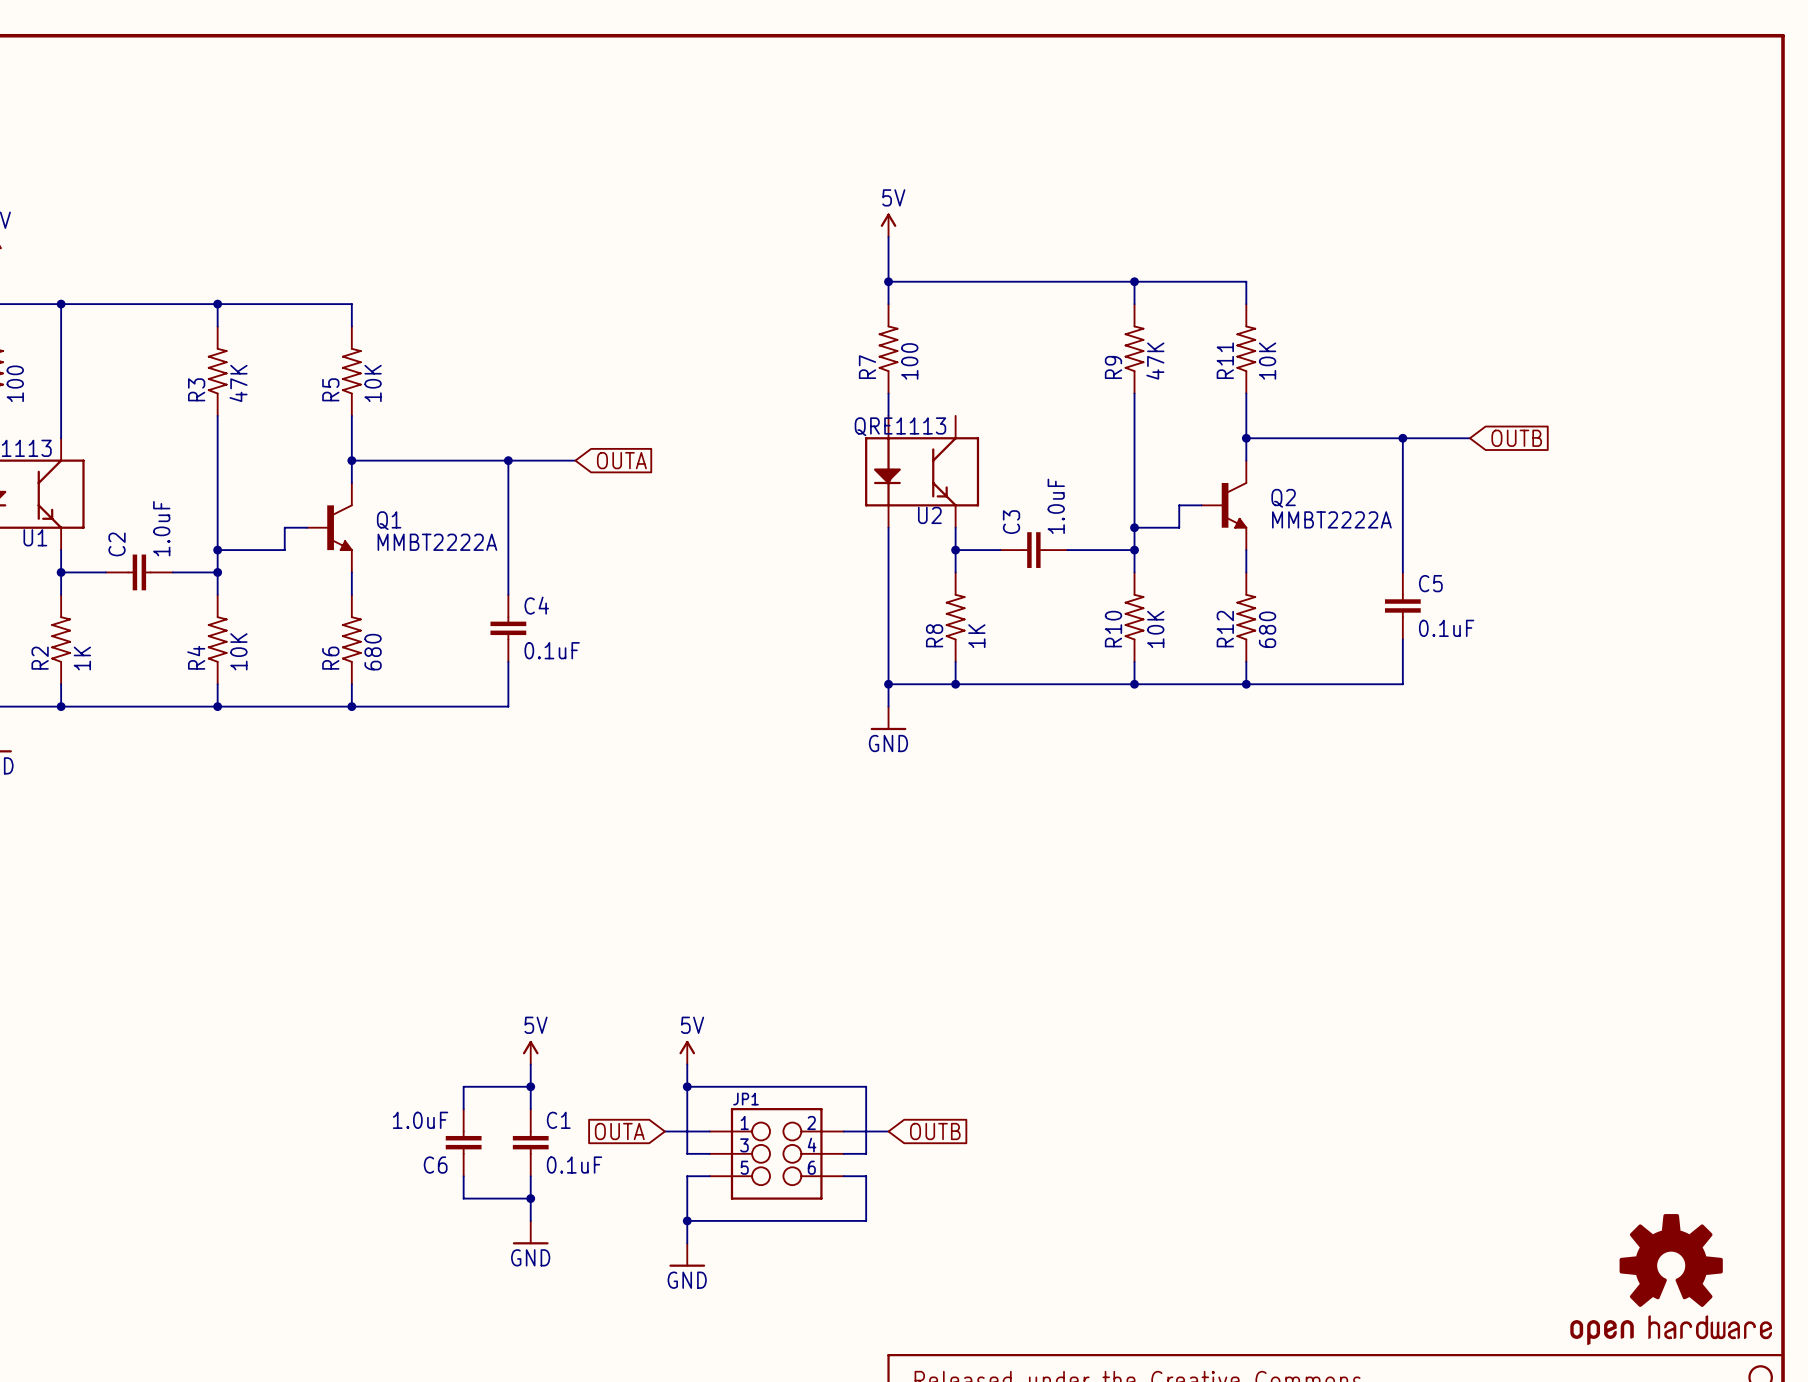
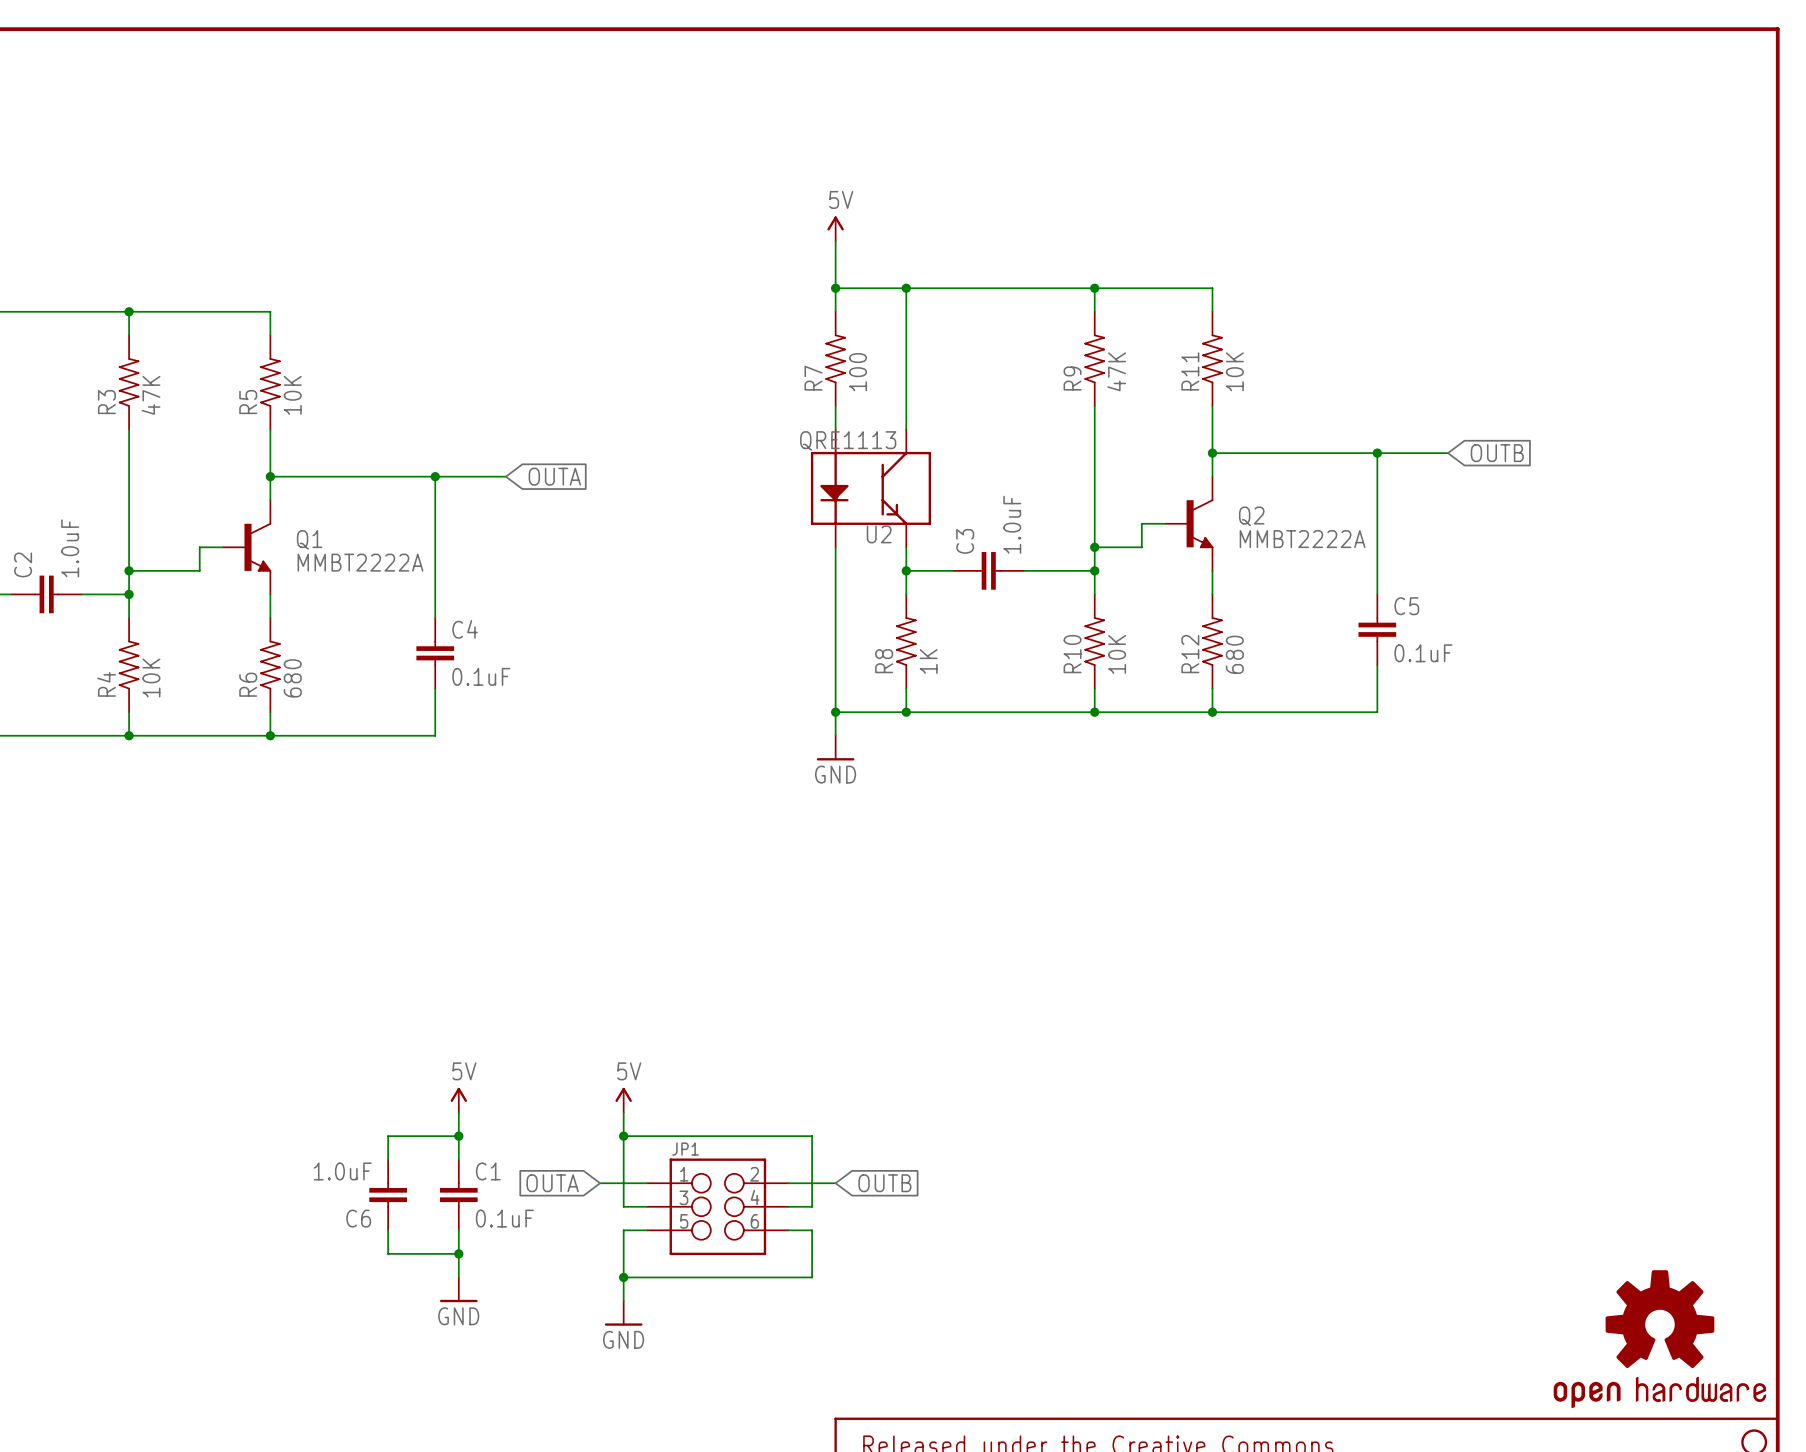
wire: none -> (906, 288) (906, 429)
junction: none -> (906, 288)

